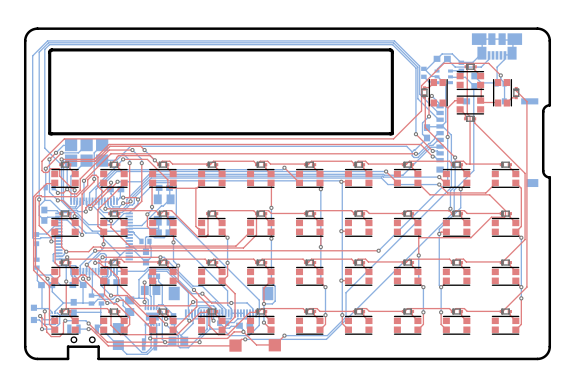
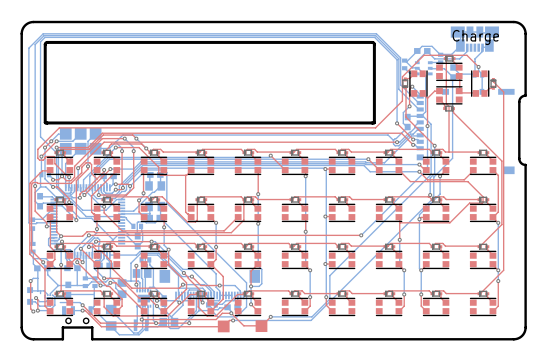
text: none -> Charge (475, 37)
bottom track: none -> (37, 278) (33, 278) (30, 281)
top track: none -> (30, 281) (30, 308) (33, 311)
via: none -> (30, 281)
top track: (44, 311) (44, 325) (46, 331) (51, 336) (59, 336) (63, 332) (63, 322) (65, 320) -> none
via: (44, 311) -> none
via: (65, 320) -> none
via: none -> (33, 311)

